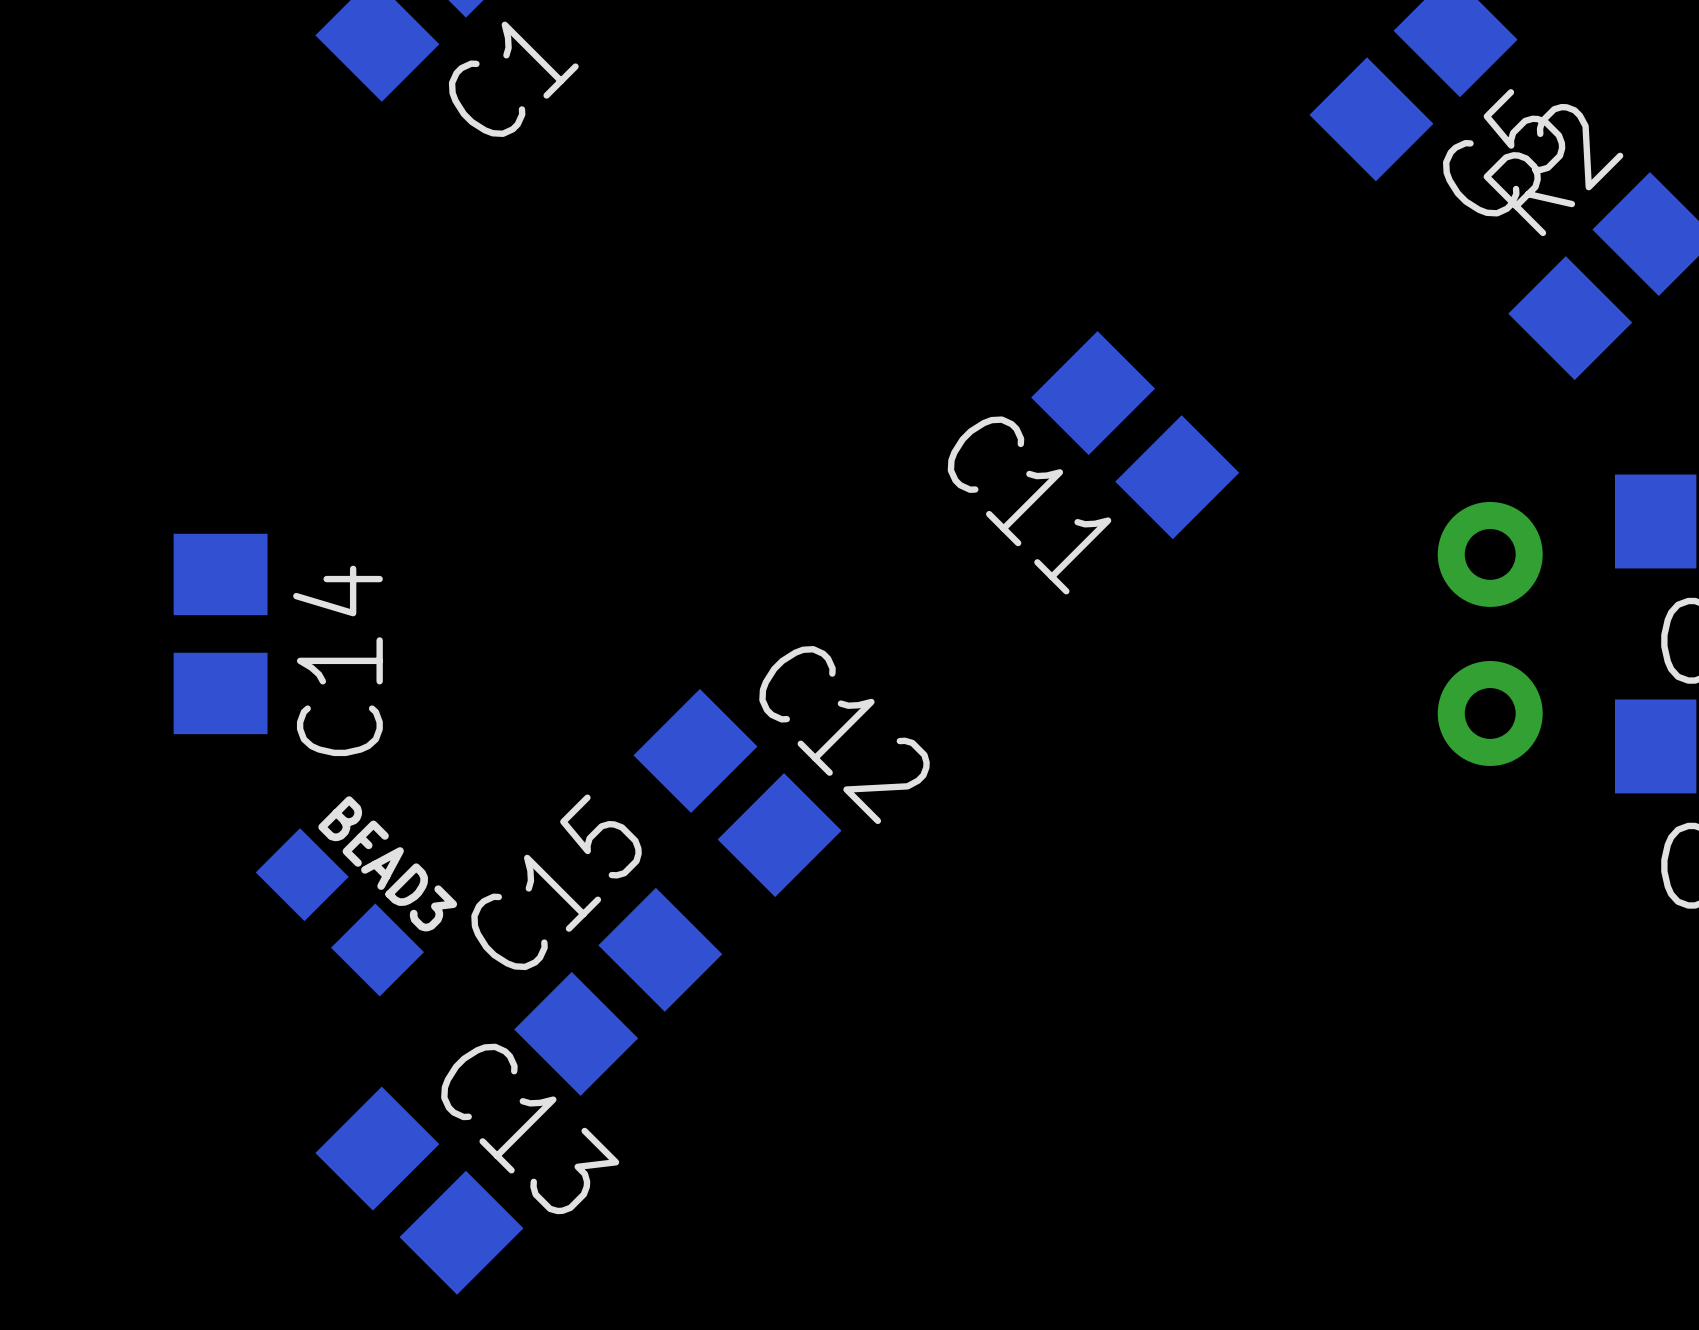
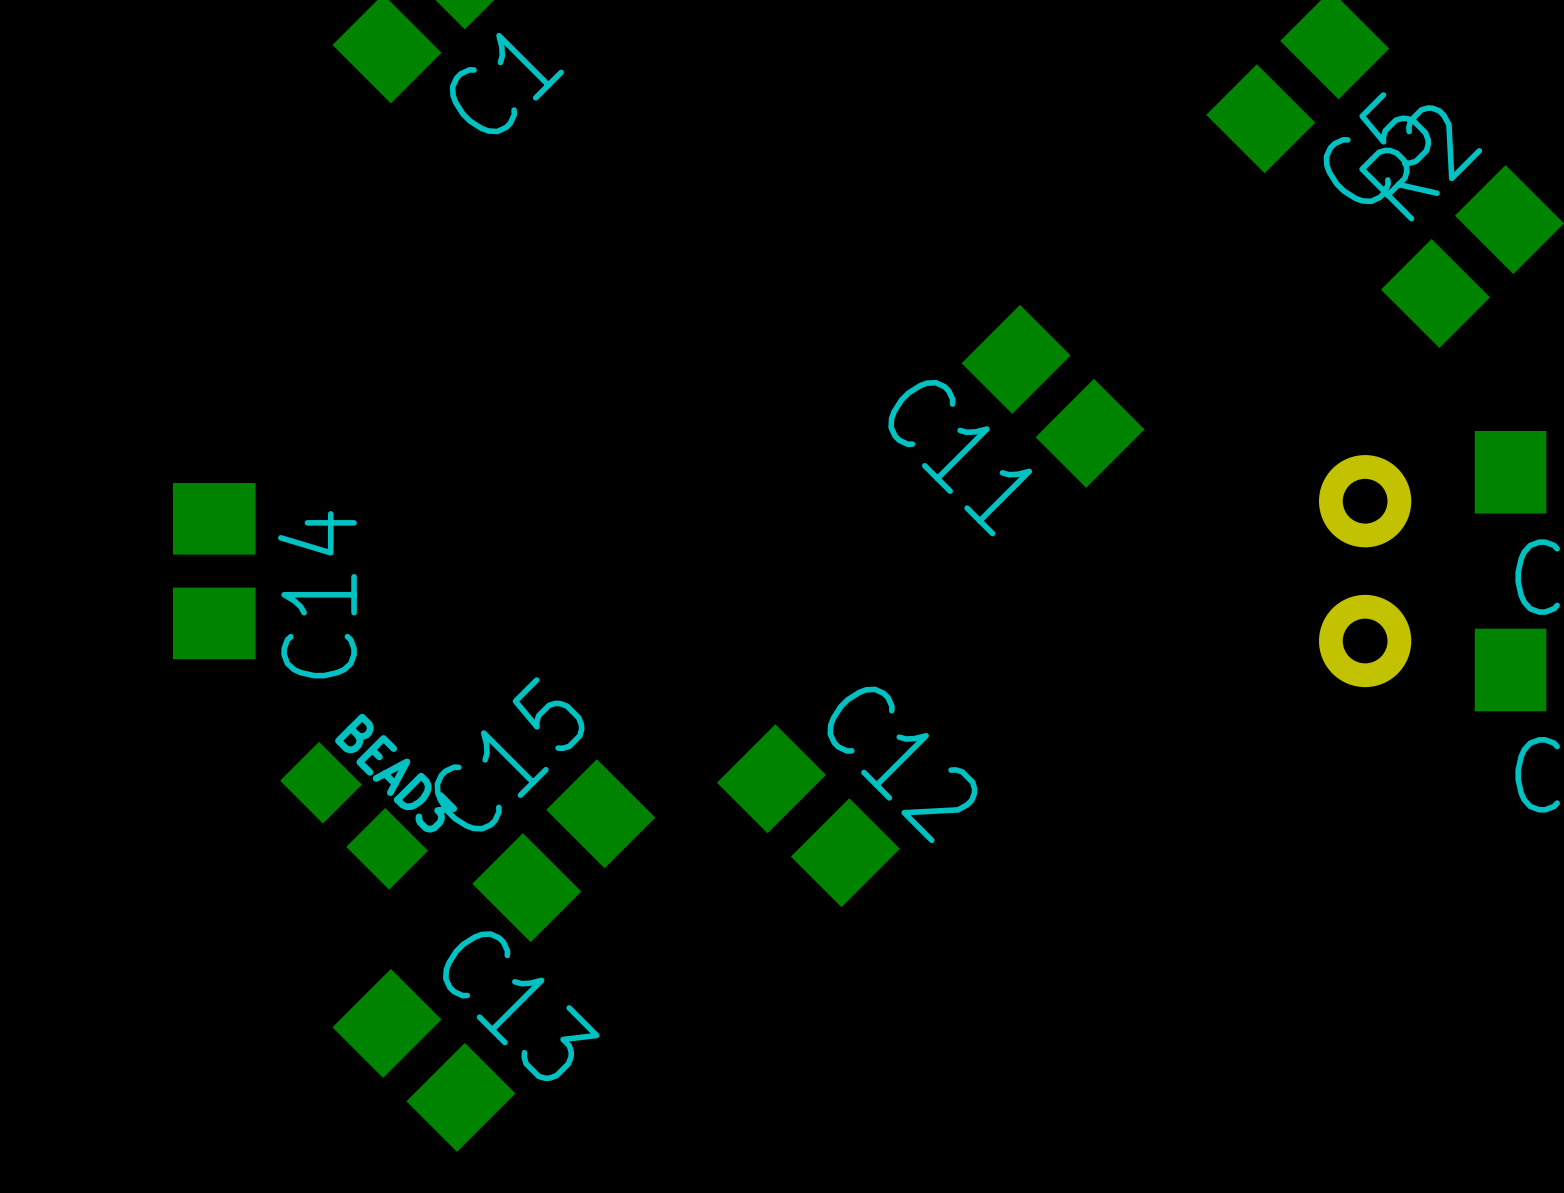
C14 position: (220, 633) -> (214, 571)
C12 position: (737, 793) -> (808, 815)
C15 position: (618, 991) -> (563, 850)

